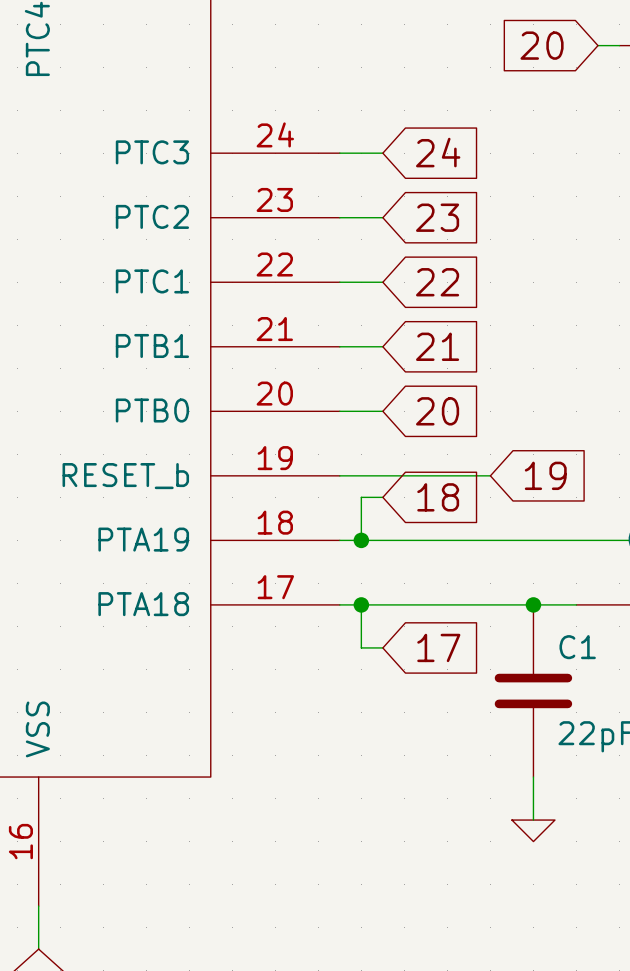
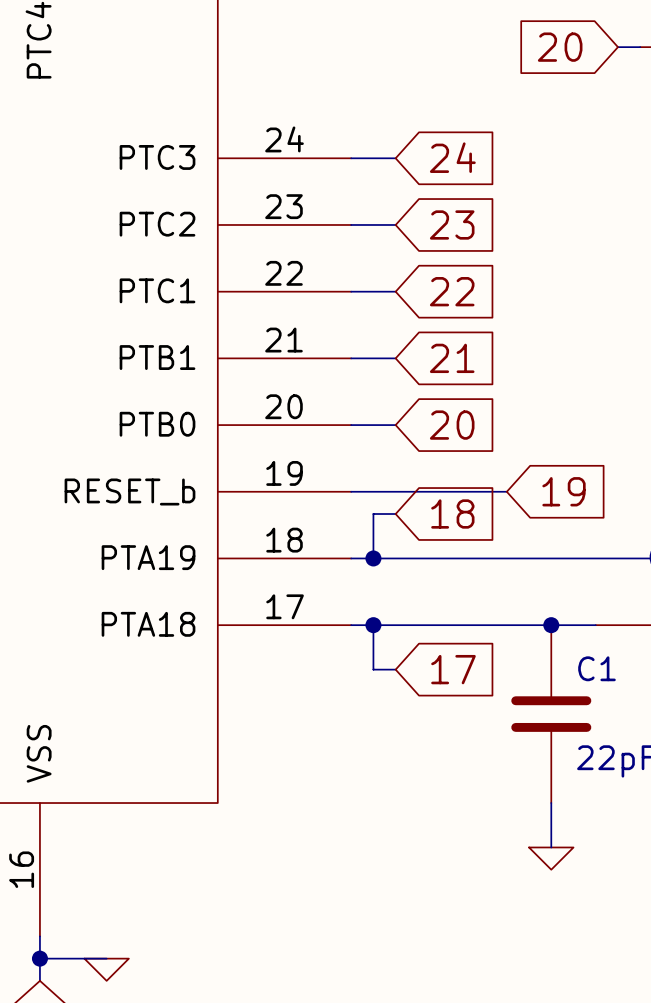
wire: none -> (39, 958) (106, 958)
junction: none -> (39, 958)
power symbol: none -> (106, 969)

